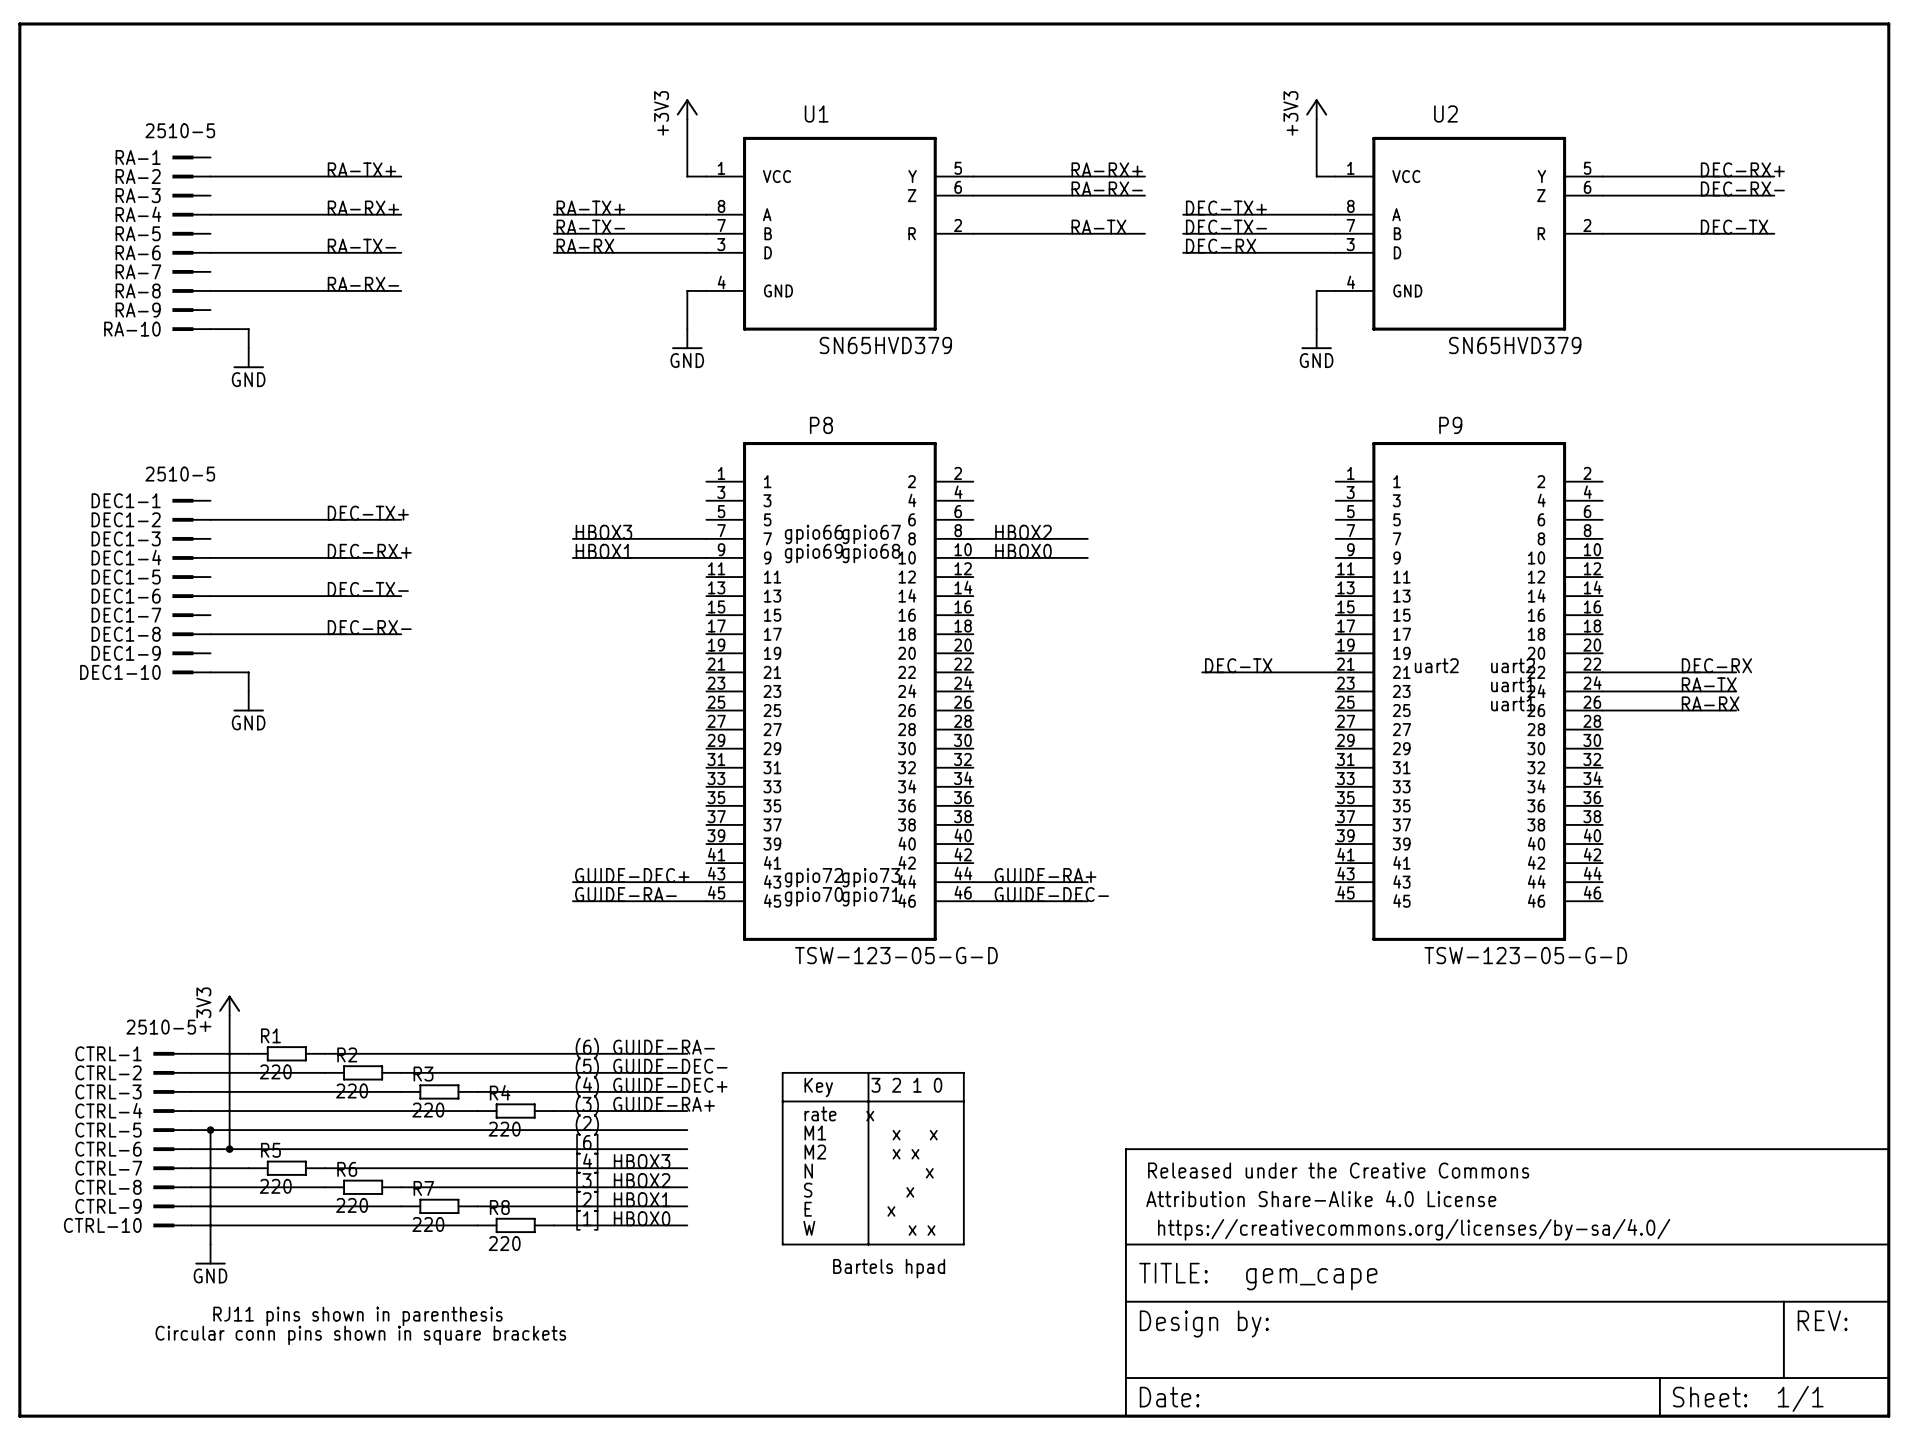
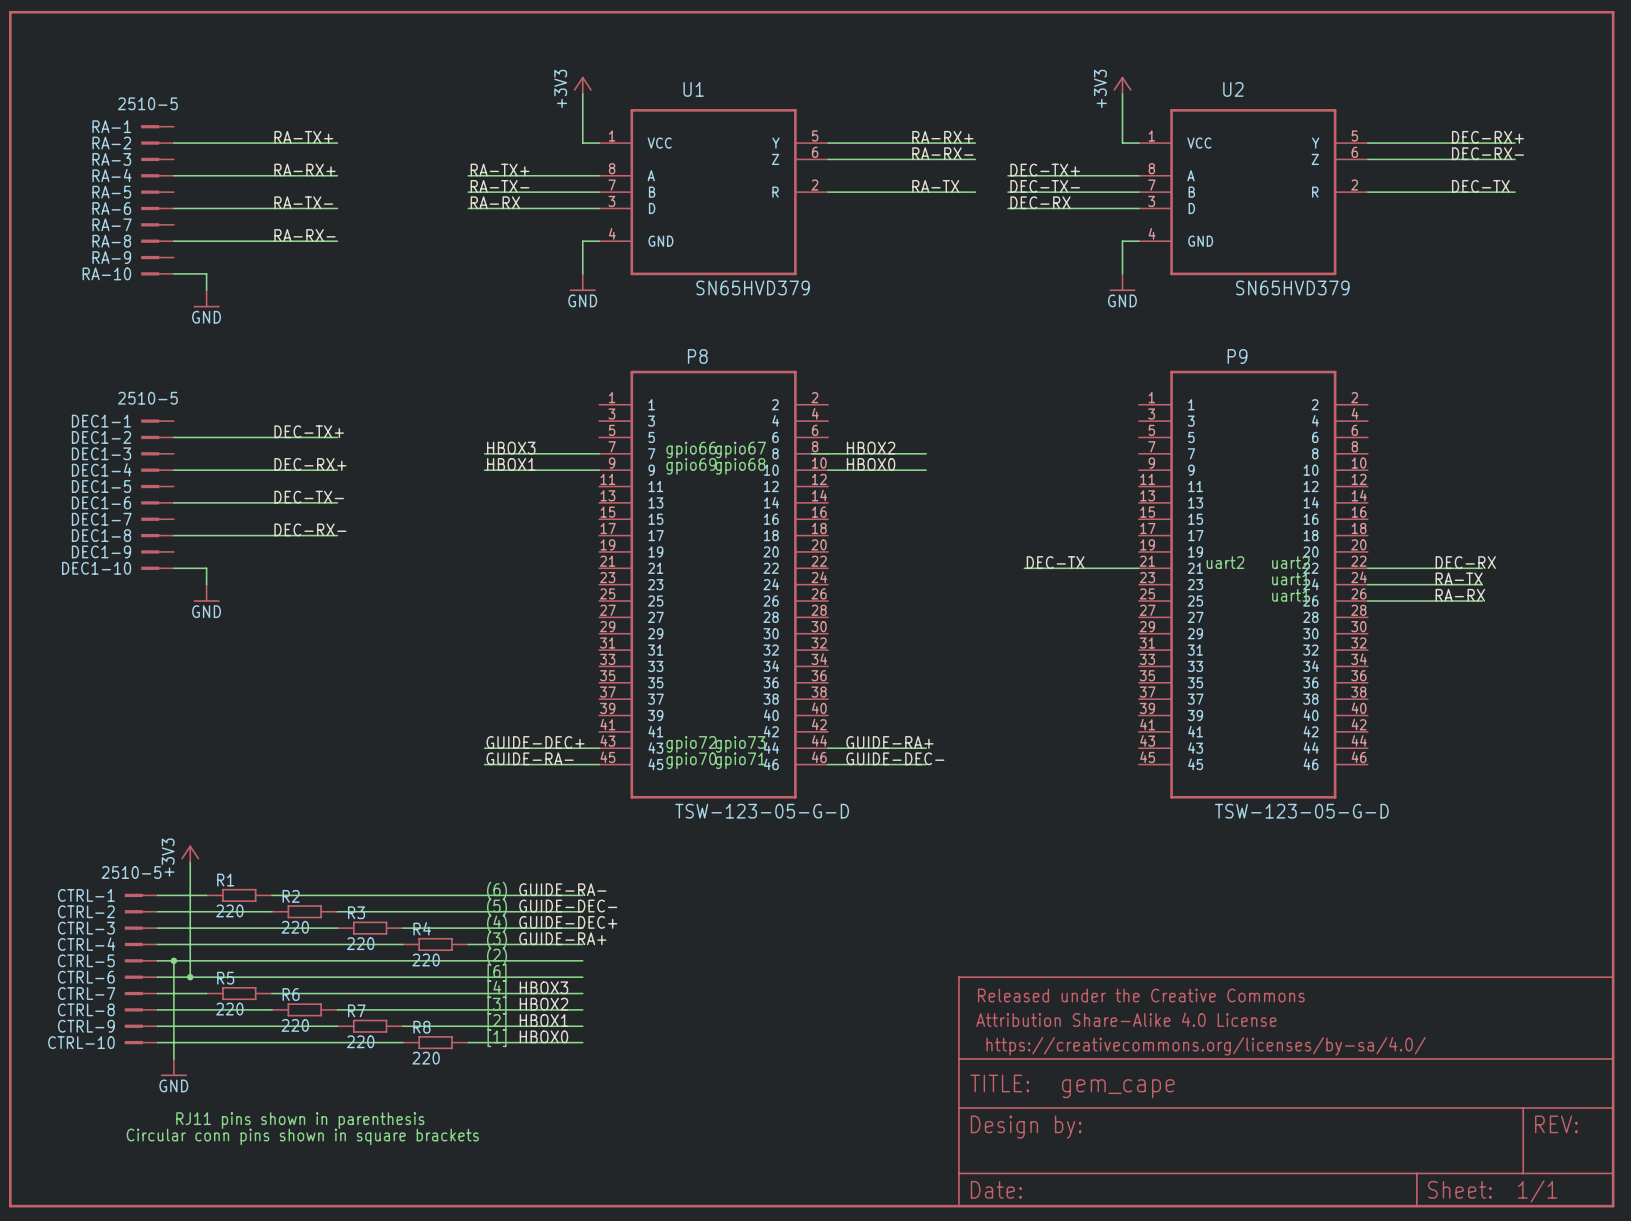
wire: (782, 1072) (963, 1072) (963, 1244) (782, 1244) (782, 1072) -> none
wire: (868, 1072) (868, 1244) -> none
text: Key 3 2 1 0 (873, 1087) -> none
wire: (782, 1101) (963, 1101) -> none
text: rate x (839, 1113) -> none
text: M1 x x (871, 1132) -> none
text: M2 x x (861, 1152) -> none
text: N x (869, 1171) -> none
text: S x (859, 1190) -> none
text: E x (849, 1209) -> none
text: W x x (869, 1228) -> none
text: Bartels hpad (889, 1268) -> none

